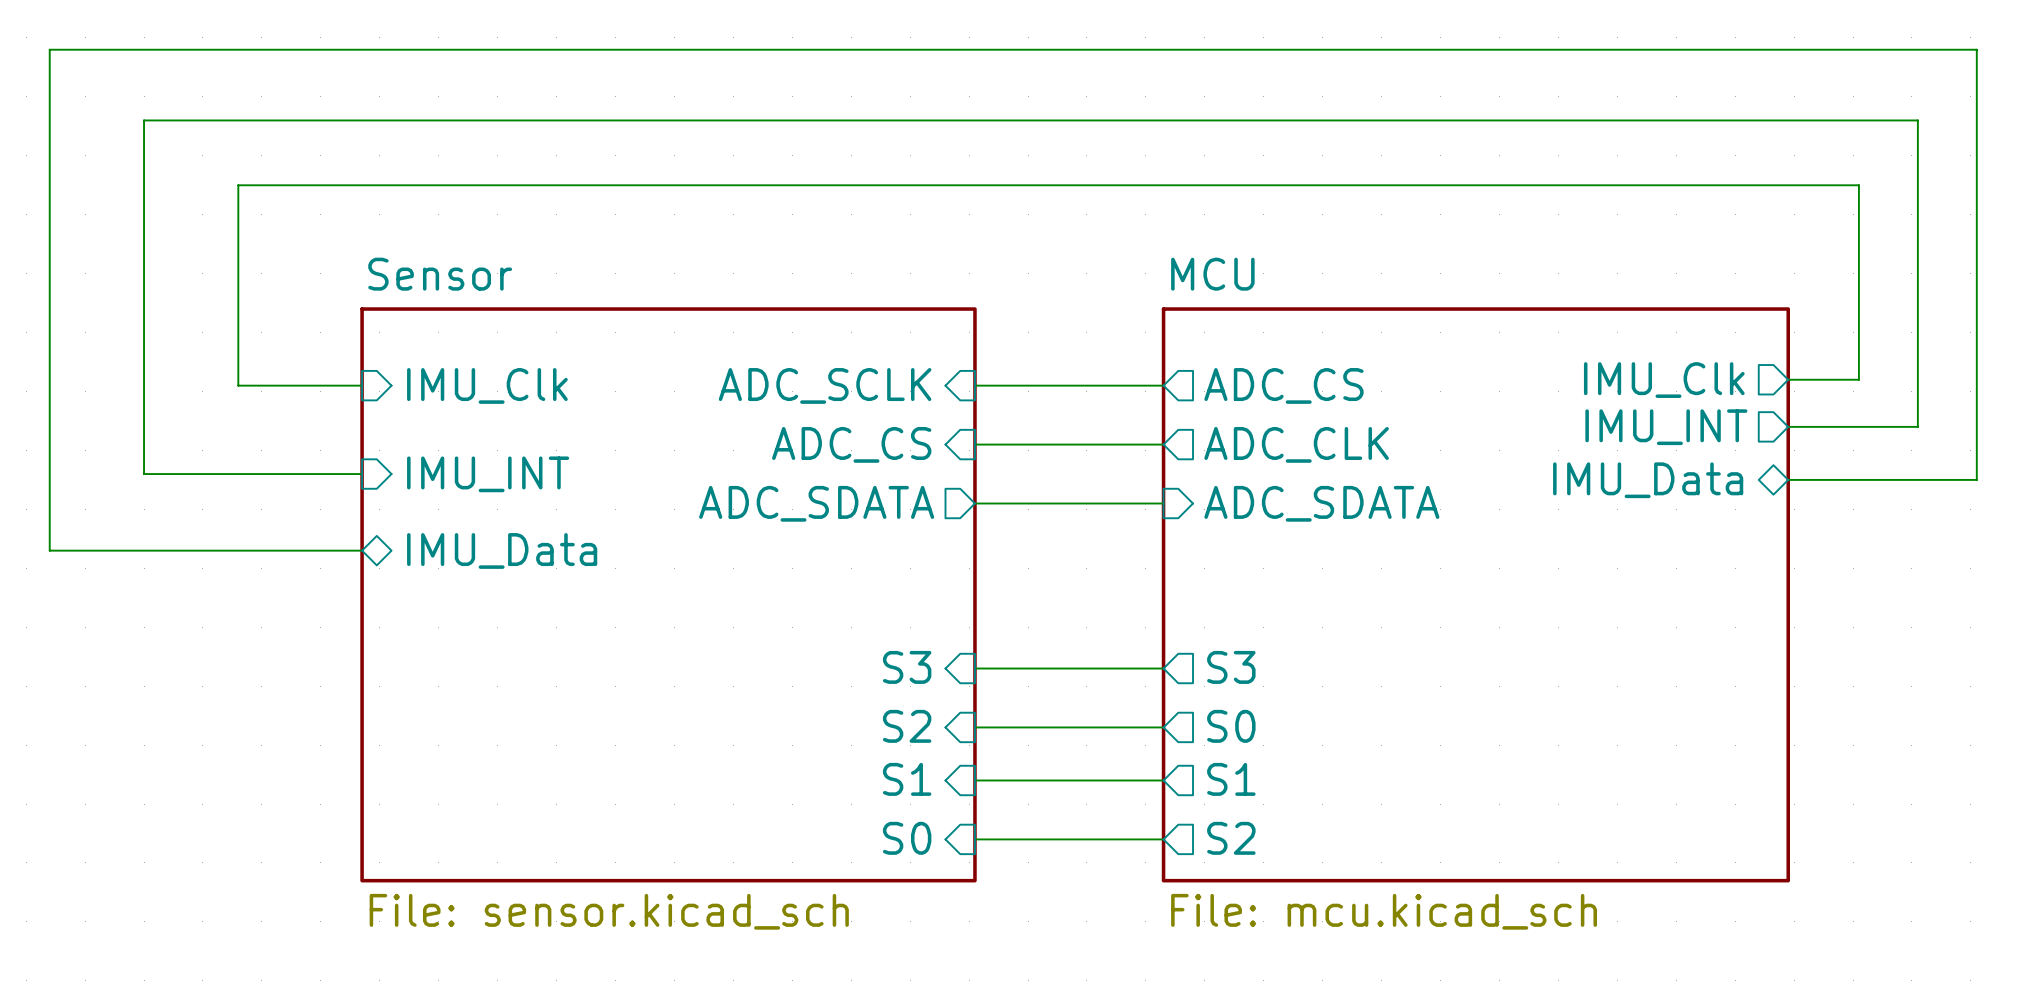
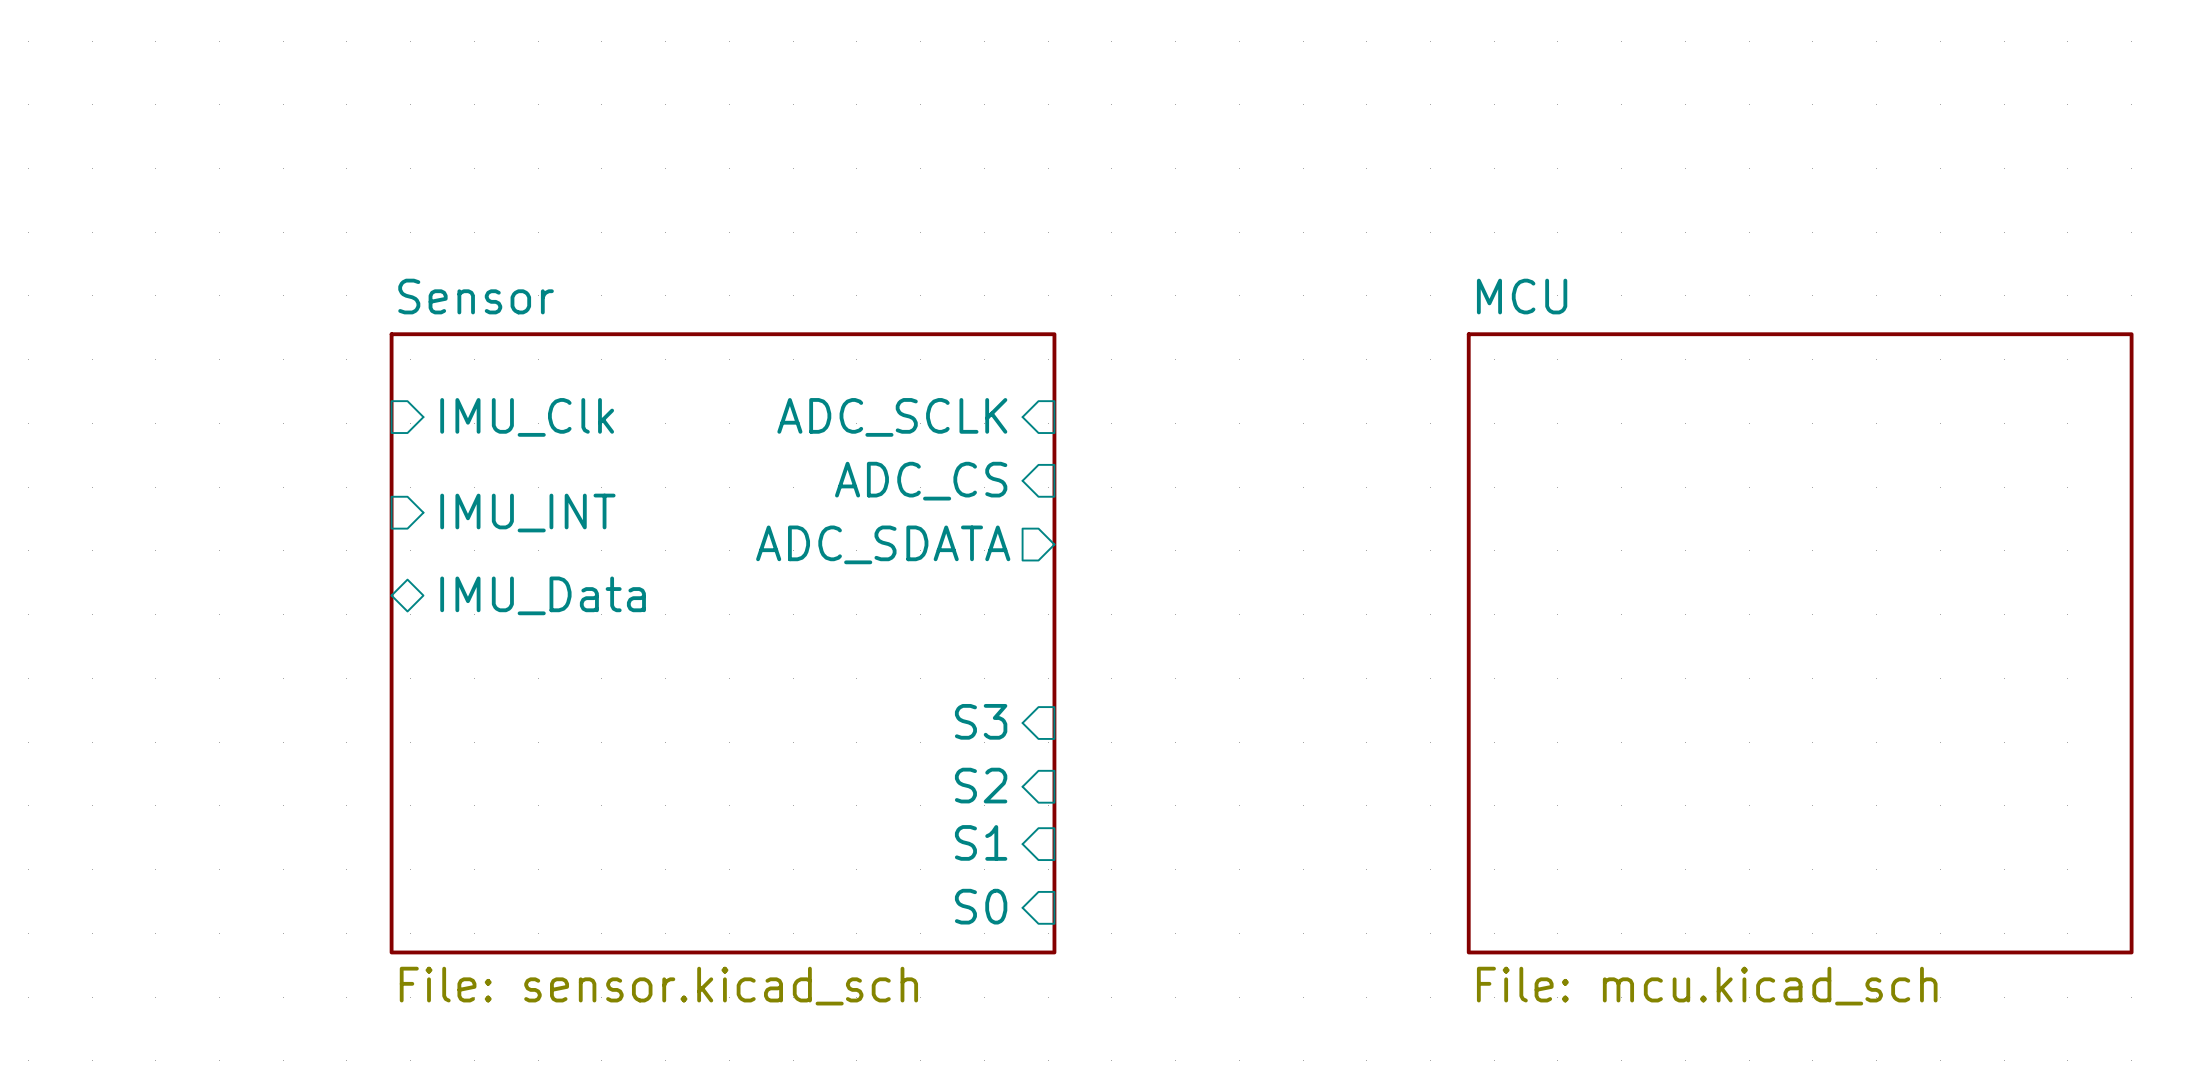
wire: (1788, 379) (1858, 379) (1858, 185) (238, 185) (238, 385) (362, 385) -> none
sheet pin: IMU_Clk (1664, 380) -> none
wire: (974, 385) (1163, 385) -> none
sheet pin: ADC_CS (1283, 385) -> none
wire: (1788, 426) (1917, 426) (1917, 120) (144, 120) (144, 474) (362, 474) -> none
sheet pin: IMU_INT (1666, 427) -> none
wire: (974, 444) (1163, 444) -> none
sheet pin: ADC_CLK (1296, 444) -> none
wire: (1788, 479) (1976, 479) (1976, 49) (49, 49) (49, 550) (362, 550) -> none
sheet pin: IMU_Data (1648, 480) -> none
wire: (974, 503) (1163, 503) -> none
sheet pin: ADC_SDATA (1321, 503) -> none
sheet MCU: File: mcu.kicad_sch (1475, 594) -> none
sheet MCU: none -> File: mcu.kicad_sch (1800, 643)
sheet pin: S3 (1231, 667) -> none
wire: (974, 668) (1163, 668) -> none
sheet pin: S0 (1231, 726) -> none
wire: (974, 727) (1163, 727) -> none
sheet pin: S1 (1231, 779) -> none
wire: (974, 780) (1163, 780) -> none
sheet pin: S2 (1231, 838) -> none
wire: (974, 839) (1163, 839) -> none

